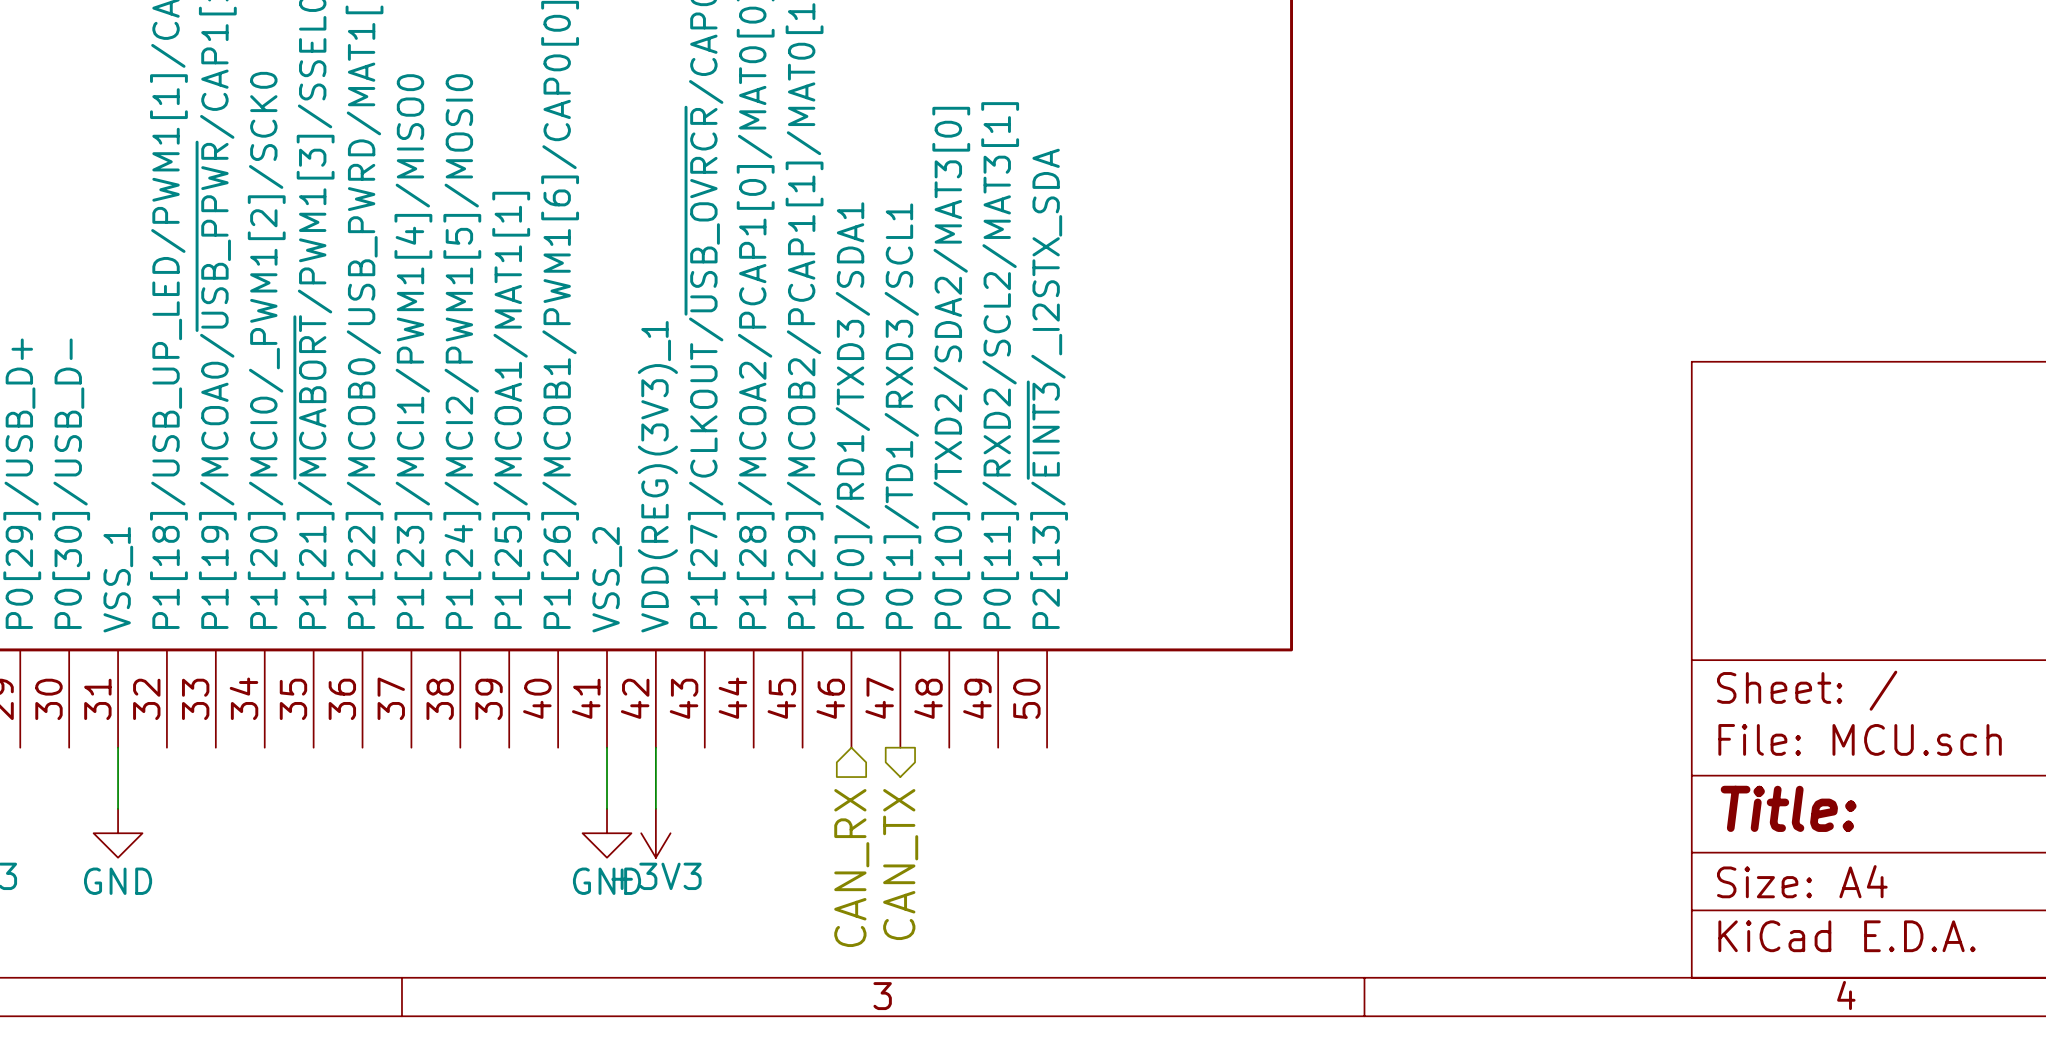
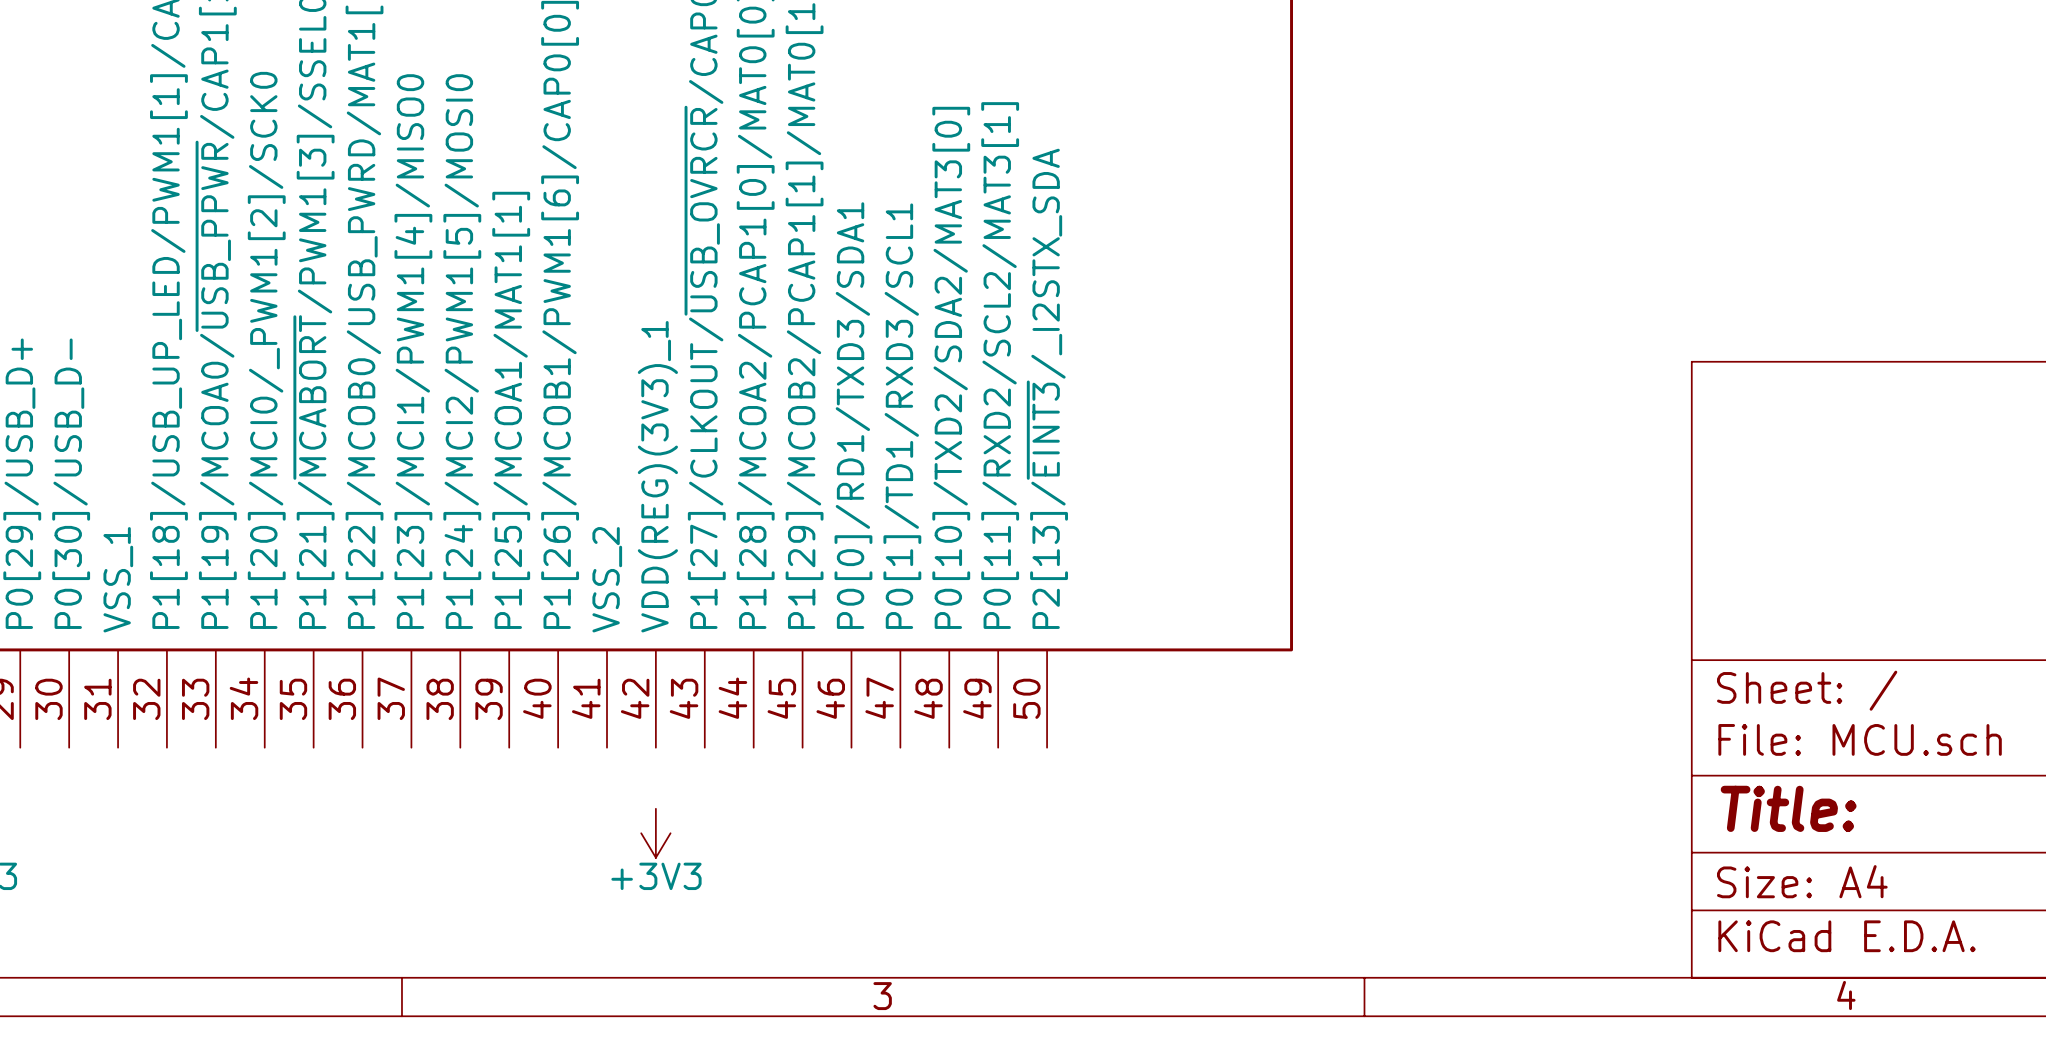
wire: (118, 747) (118, 808) -> none
wire: (607, 747) (607, 808) -> none
wire: (655, 747) (655, 808) -> none
power symbol: GND (118, 833) -> none
power symbol: GND (607, 833) -> none
hierarchical label: CAN_TX (900, 864) -> none
hierarchical label: CAN_RX (851, 868) -> none

